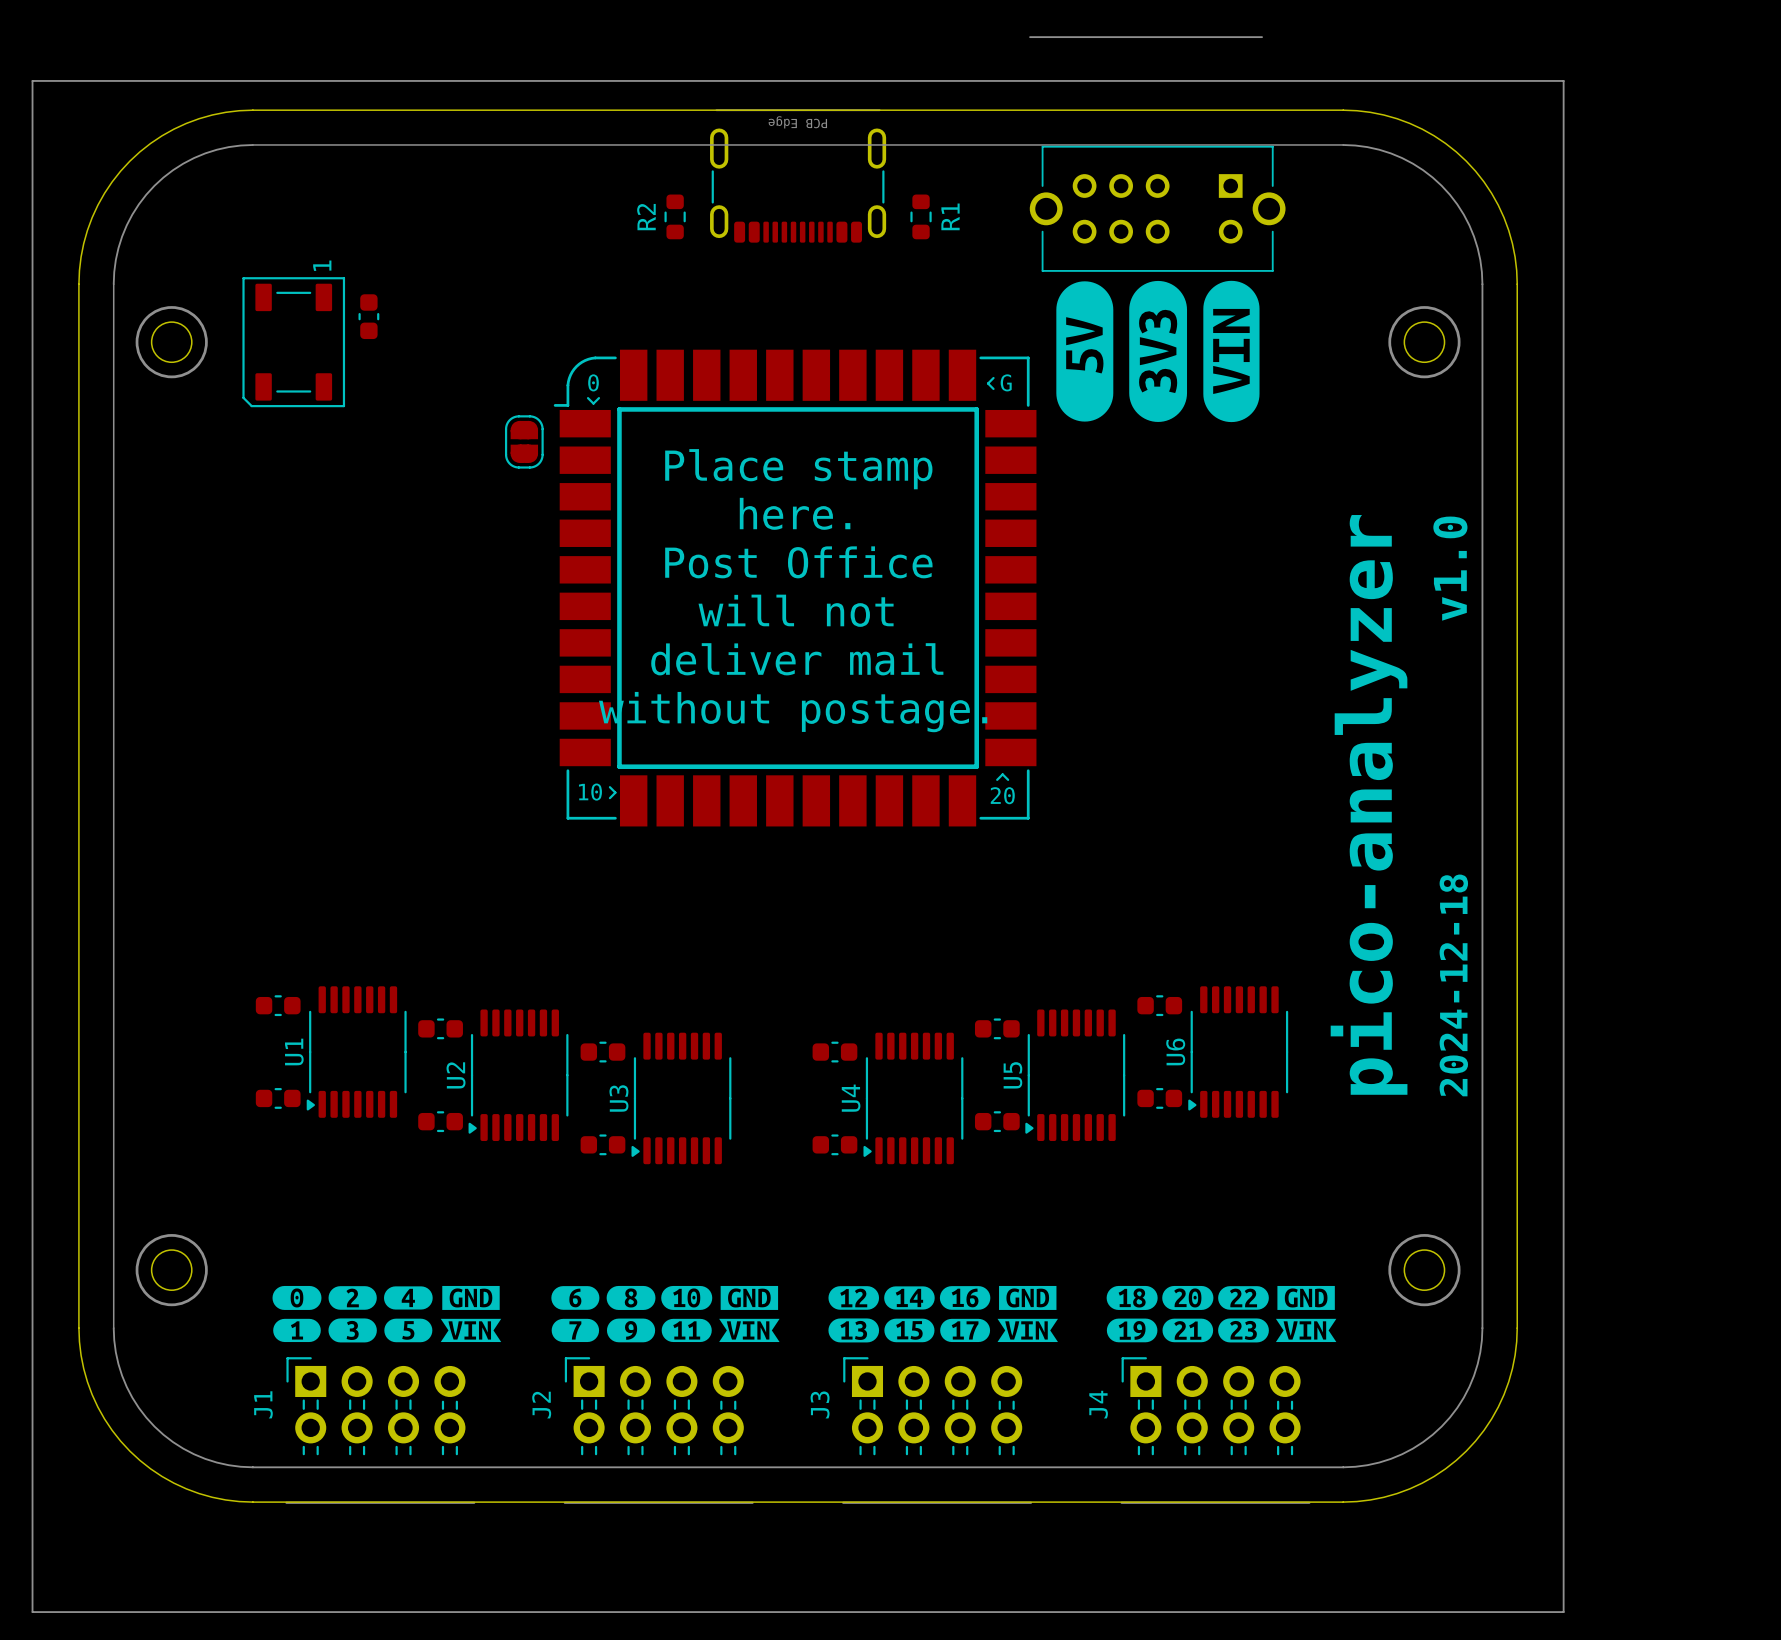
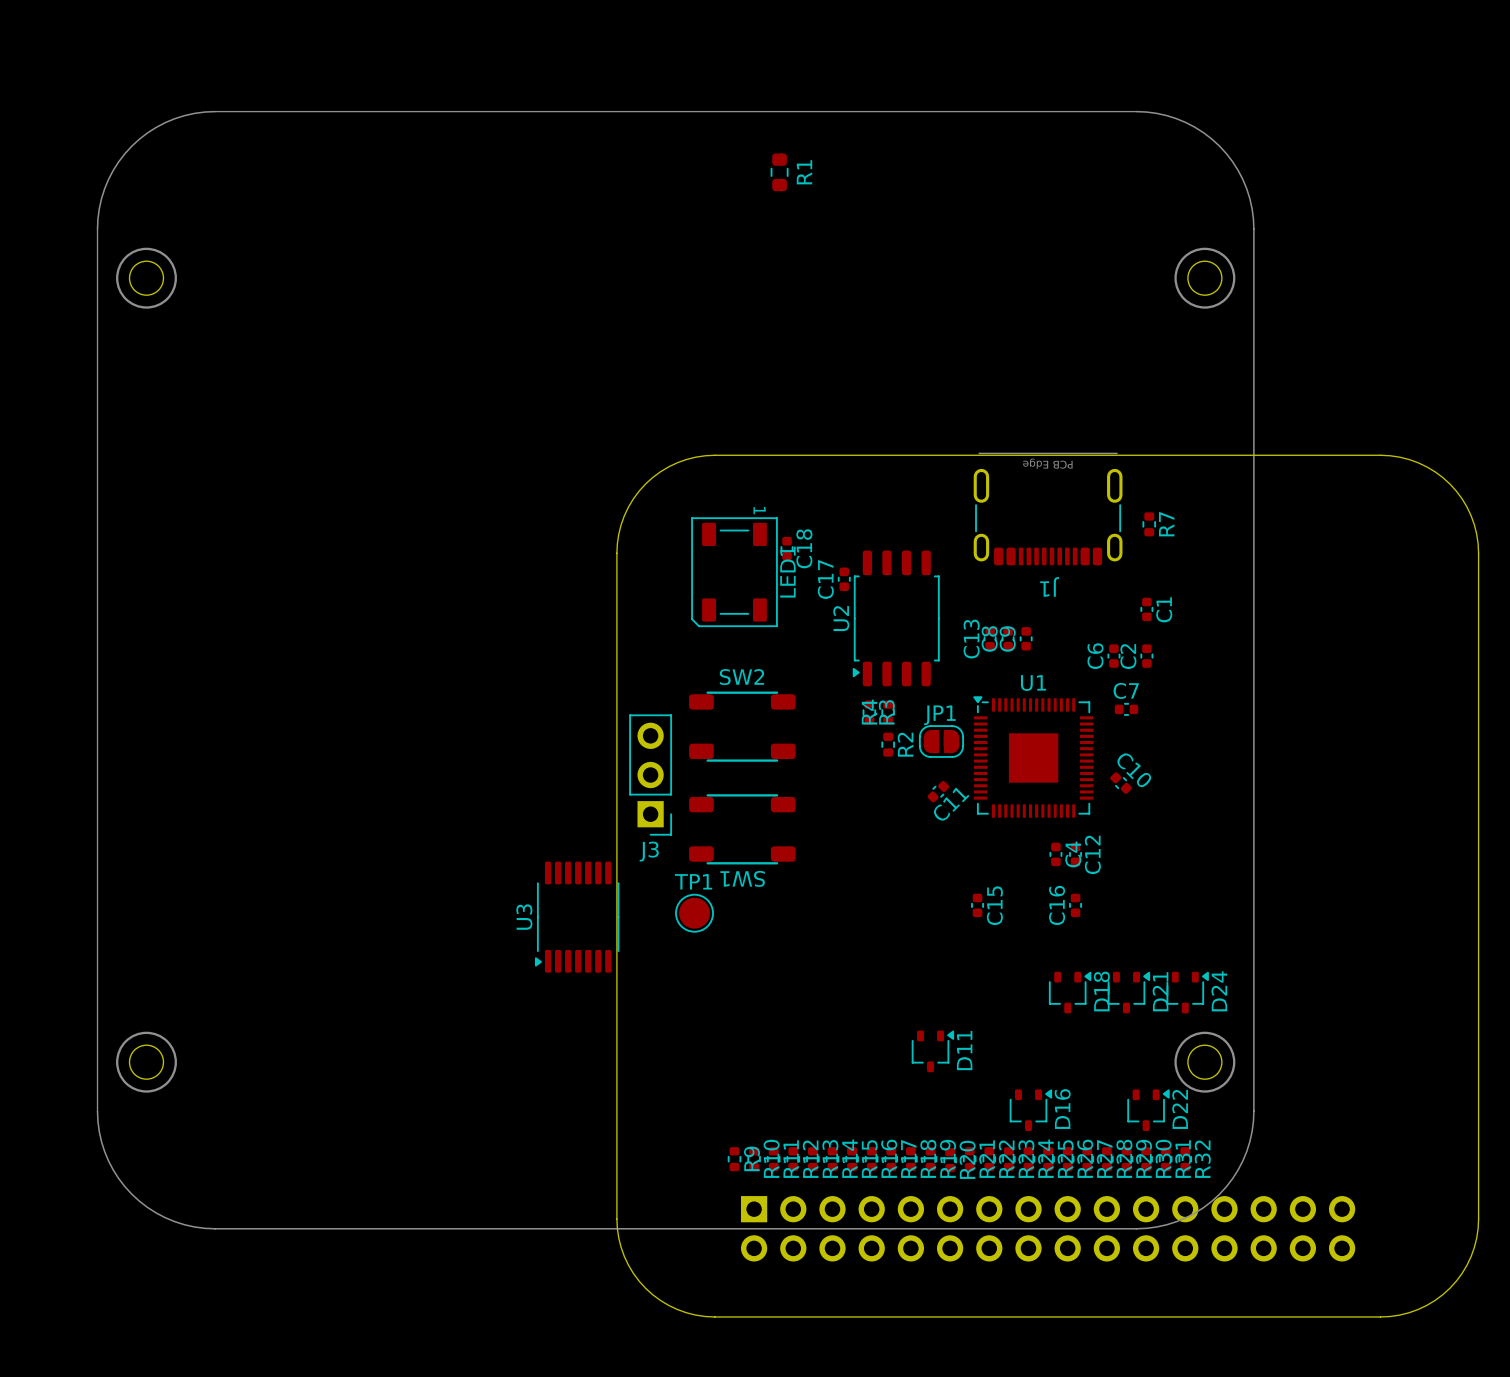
line: (1030, 37) (1262, 37) -> none
line: (32, 80) (1563, 80) (1563, 1612) (32, 1612) (32, 80) -> none
board edge: (252, 110) (1356, 110) (1397, 118) (1422, 129) (1456, 151) (1475, 171) (1491, 193) (1503, 217) (1512, 243) (1517, 284) (1517, 1328) (1512, 1368) (1498, 1407) (1484, 1430) (1456, 1460) (1434, 1476) (1409, 1488) (1383, 1497) (1343, 1502) (252, 1502) (212, 1497) (186, 1488) (150, 1468) (120, 1441) (97, 1407) (87, 1381) (81, 1355) (78, 1328) (79, 270) (83, 243) (97, 205) (112, 181) (139, 151) (162, 135) (186, 123) (225, 112) (252, 110) -> none
part: (798, 175) -> none
R2 footprint: [664, 194, 686, 240] -> [881, 732, 895, 757]
part: (1157, 208) -> none
R2 name position: R2 (646, 217) -> R2 (905, 744)
drawing: [1056, 280, 1260, 423] -> none
part: (368, 316) -> none
part: (293, 342) -> none
line: (619, 409) (976, 409) (976, 766) (619, 766) (619, 409) -> none
part: (524, 441) -> none
text: Place stamp (798, 469) -> none
text: here. (795, 513) -> none
board edge: none -> (714, 455) (1380, 455) (1409, 459) (1426, 466) (1442, 477) (1456, 491) (1471, 515) (1476, 534) (1478, 553) (1478, 1218) (1476, 1238) (1471, 1256) (1456, 1281) (1442, 1294) (1426, 1305) (1409, 1312) (1380, 1316) (714, 1316) (686, 1312) (668, 1305) (652, 1294) (639, 1281) (628, 1265) (621, 1247) (616, 1218) (617, 543) (621, 524) (628, 507) (645, 483) (660, 471) (677, 462) (695, 457) (714, 455)
text: Post Office (798, 562) -> none
text: v1.0 (1450, 568) -> none
part: (795, 588) -> none
text: will not (796, 610) -> none
R7: none -> (1149, 524)
text: deliver mail (797, 659) -> none
C18: none -> (787, 548)
LED1: none -> (734, 572)
C17: none -> (844, 579)
text: without postage. (793, 712) -> none
C1: none -> (1146, 609)
C13: none -> (990, 638)
C8: none -> (1008, 638)
C9: none -> (1026, 638)
C6: none -> (1113, 656)
C2: none -> (1146, 656)
text: pico-analyzer (1369, 804) -> none
C7: none -> (1126, 709)
R3: none -> (869, 712)
R4: none -> (888, 712)
SW2: none -> (742, 726)
JP1: none -> (941, 741)
C10: none -> (1121, 783)
C11: none -> (938, 791)
text: 2024-12-18 (1453, 985) -> none
U1 footprint: [306, 986, 407, 1118] -> [973, 696, 1094, 818]
SW1: none -> (742, 829)
part: (278, 1005) -> none
part: (1159, 1005) -> none
U2 footprint: [468, 1009, 569, 1142] -> [852, 550, 940, 687]
C4: none -> (1055, 854)
C12: none -> (1075, 854)
part: (440, 1028) -> none
part: (997, 1028) -> none
U1 name position: U1 (294, 1052) -> U1 (1033, 683)
part: (602, 1052) -> none
part: (834, 1052) -> none
U6: (1238, 1052) -> none
U5: (1075, 1075) -> none
C15: none -> (977, 905)
C16: none -> (1075, 905)
TP1: none -> (694, 913)
part: (278, 1098) -> none
U4: (913, 1098) -> none
part: (1159, 1098) -> none
part: (440, 1121) -> none
part: (997, 1121) -> none
part: (602, 1144) -> none
part: (834, 1144) -> none
D18: none -> (1070, 992)
D21: none -> (1128, 992)
D24: none -> (1187, 992)
D11: none -> (932, 1051)
drawing: [272, 1285, 502, 1343] -> none
drawing: [551, 1285, 780, 1343] -> none
drawing: [828, 1285, 1058, 1343] -> none
drawing: [1106, 1285, 1337, 1343] -> none
D16: none -> (1030, 1110)
D22: none -> (1148, 1110)
J1 footprint: [285, 1357, 476, 1504] -> [973, 452, 1123, 566]
J3 footprint: [842, 1357, 1033, 1504] -> [629, 714, 673, 836]
R9: none -> (734, 1159)
R10: none -> (754, 1159)
R11: none -> (773, 1159)
R12: none -> (793, 1159)
R13: none -> (812, 1159)
R14: none -> (832, 1159)
R15: none -> (852, 1159)
R16: none -> (871, 1159)
R17: none -> (891, 1159)
R18: none -> (910, 1159)
R19: none -> (930, 1159)
R21: none -> (969, 1159)
R22: none -> (989, 1159)
R23: none -> (1008, 1159)
R24: none -> (1028, 1159)
R25: none -> (1048, 1159)
R26: none -> (1067, 1159)
R27: none -> (1087, 1159)
R28: none -> (1106, 1159)
R29: none -> (1126, 1159)
R30: none -> (1146, 1159)
R31: none -> (1165, 1159)
R32: none -> (1185, 1159)
R20: none -> (950, 1160)
J1 name position: J1 (263, 1404) -> J1 (1049, 586)
J3 name position: J3 (820, 1404) -> J3 (649, 851)
J2: (658, 1430) -> none
J4: (1215, 1430) -> none
part: none -> (1048, 1228)

